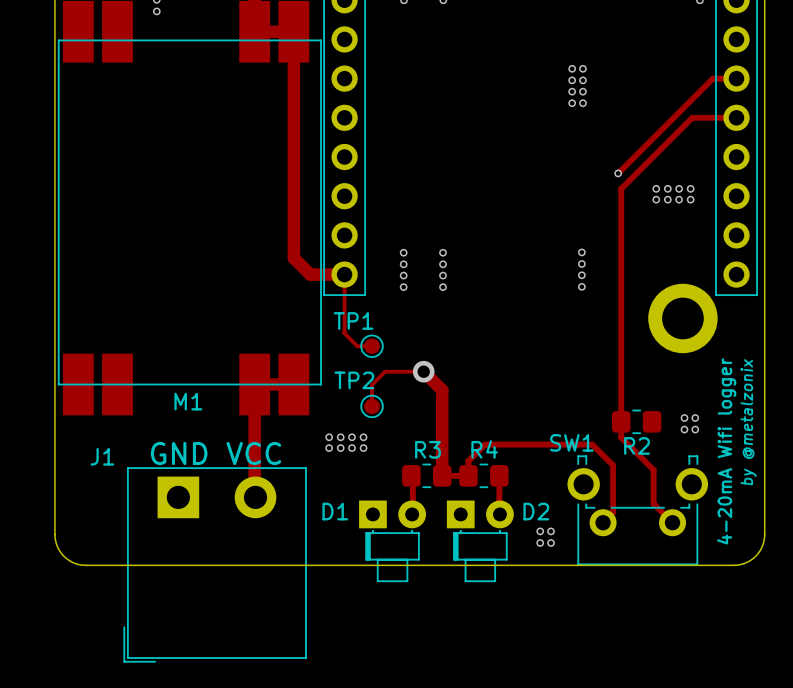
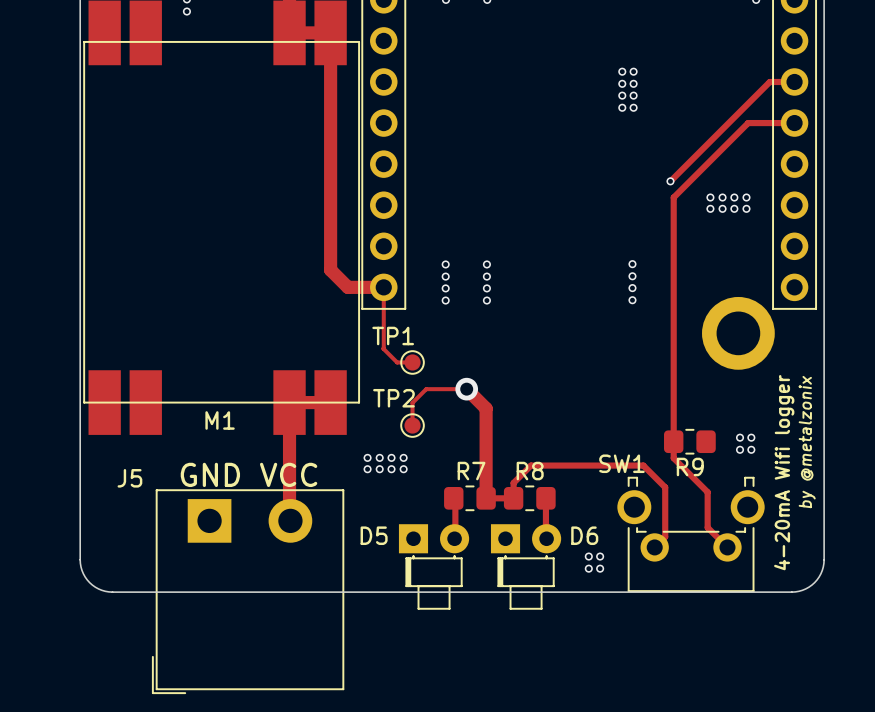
R2 name: R2 (637, 445) -> R9 (690, 466)
R3 name: R3 (427, 449) -> R7 (471, 471)
R4 name: R4 (484, 449) -> R8 (530, 471)
J1 name: J1 (102, 456) -> J5 (129, 478)
D1 name: D1 (335, 511) -> D5 (374, 535)
D2 name: D2 (536, 511) -> D6 (584, 535)

